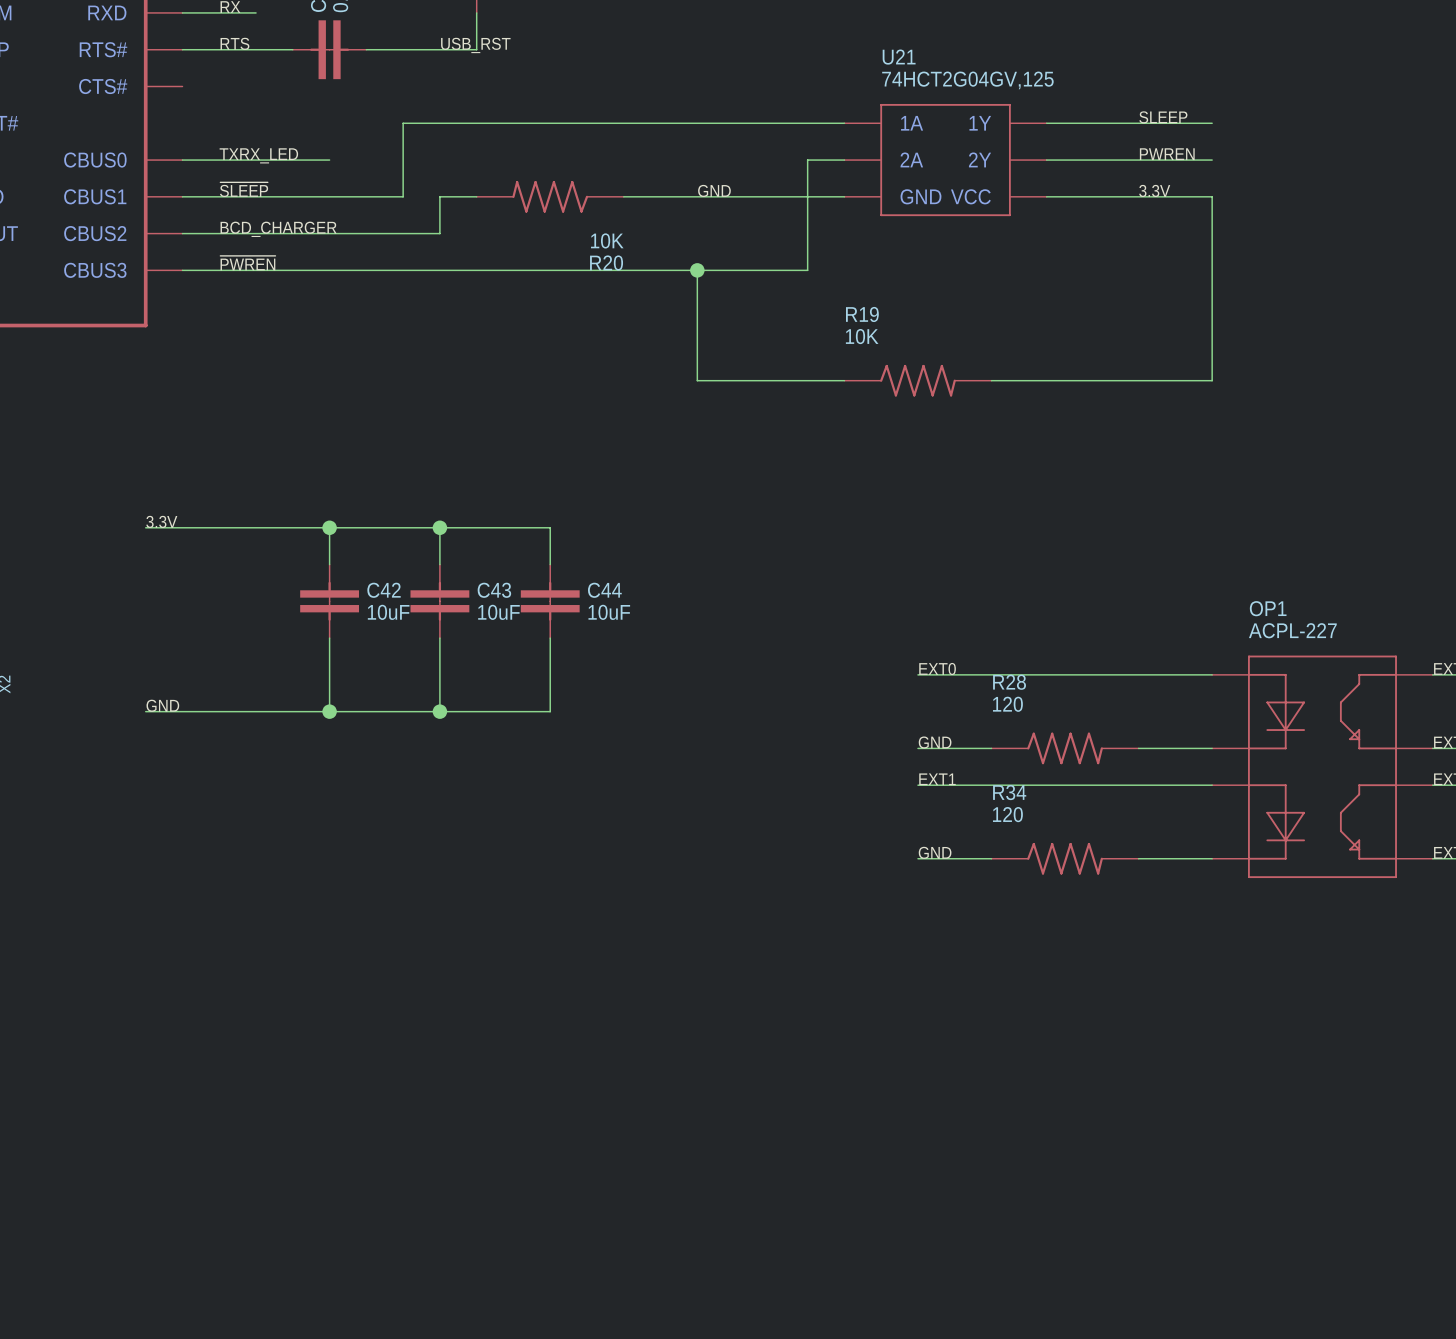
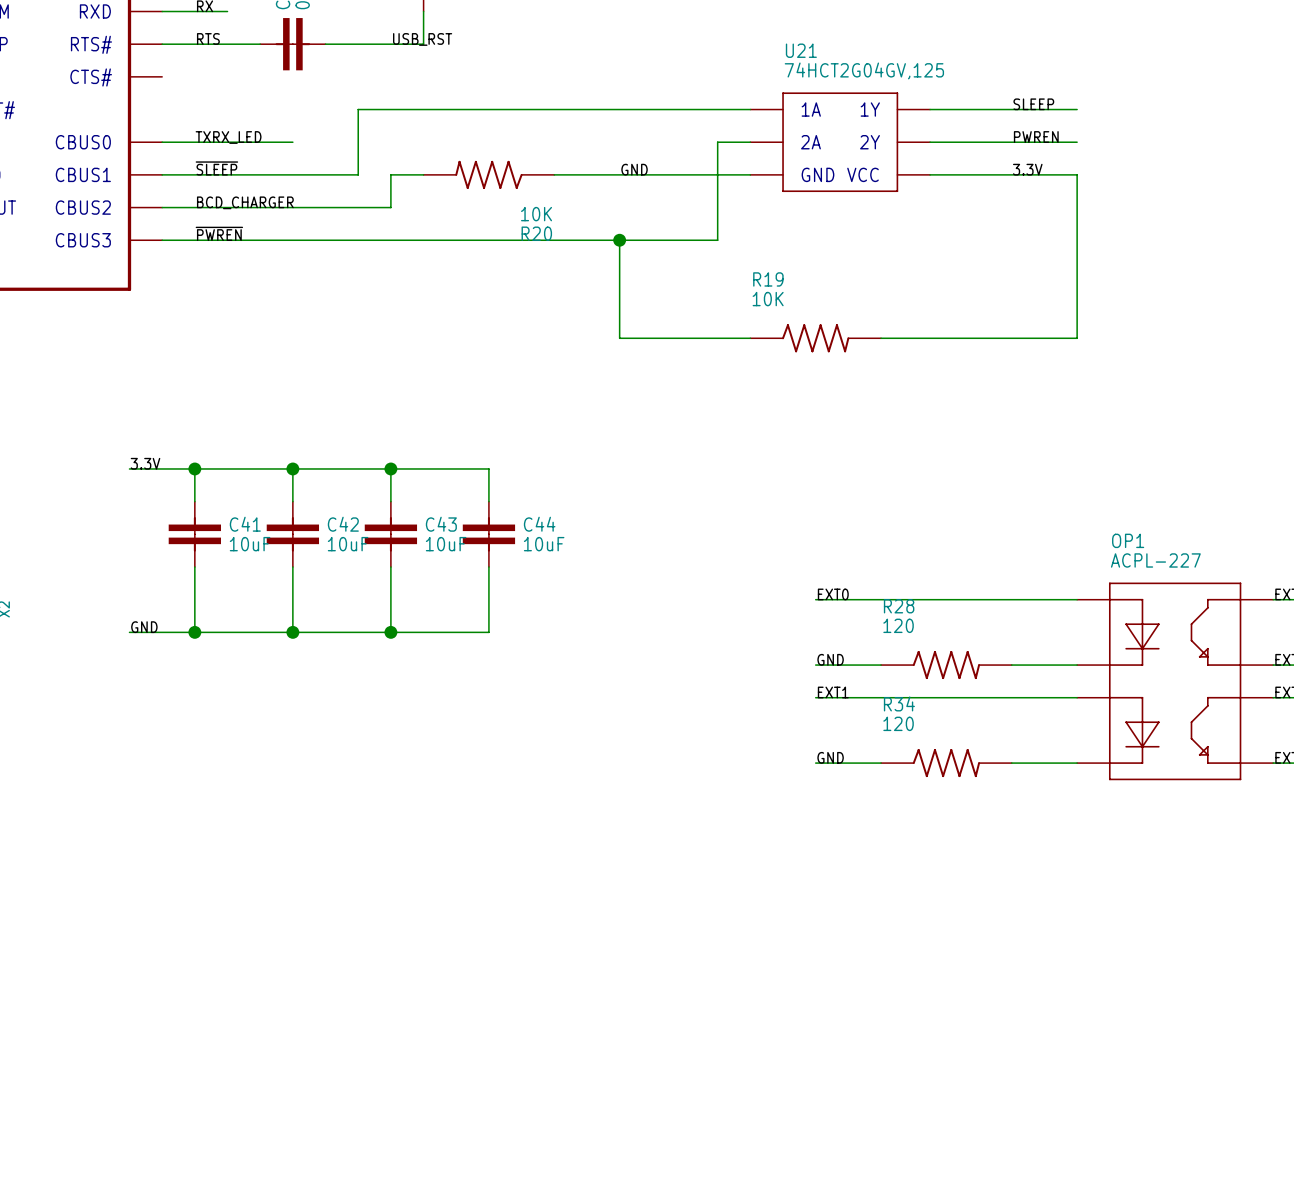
wire: none -> (194, 468) (194, 501)
junction: none -> (194, 468)
C41: none -> 10uF (194, 534)
wire: none -> (194, 567) (194, 632)
junction: none -> (194, 632)

